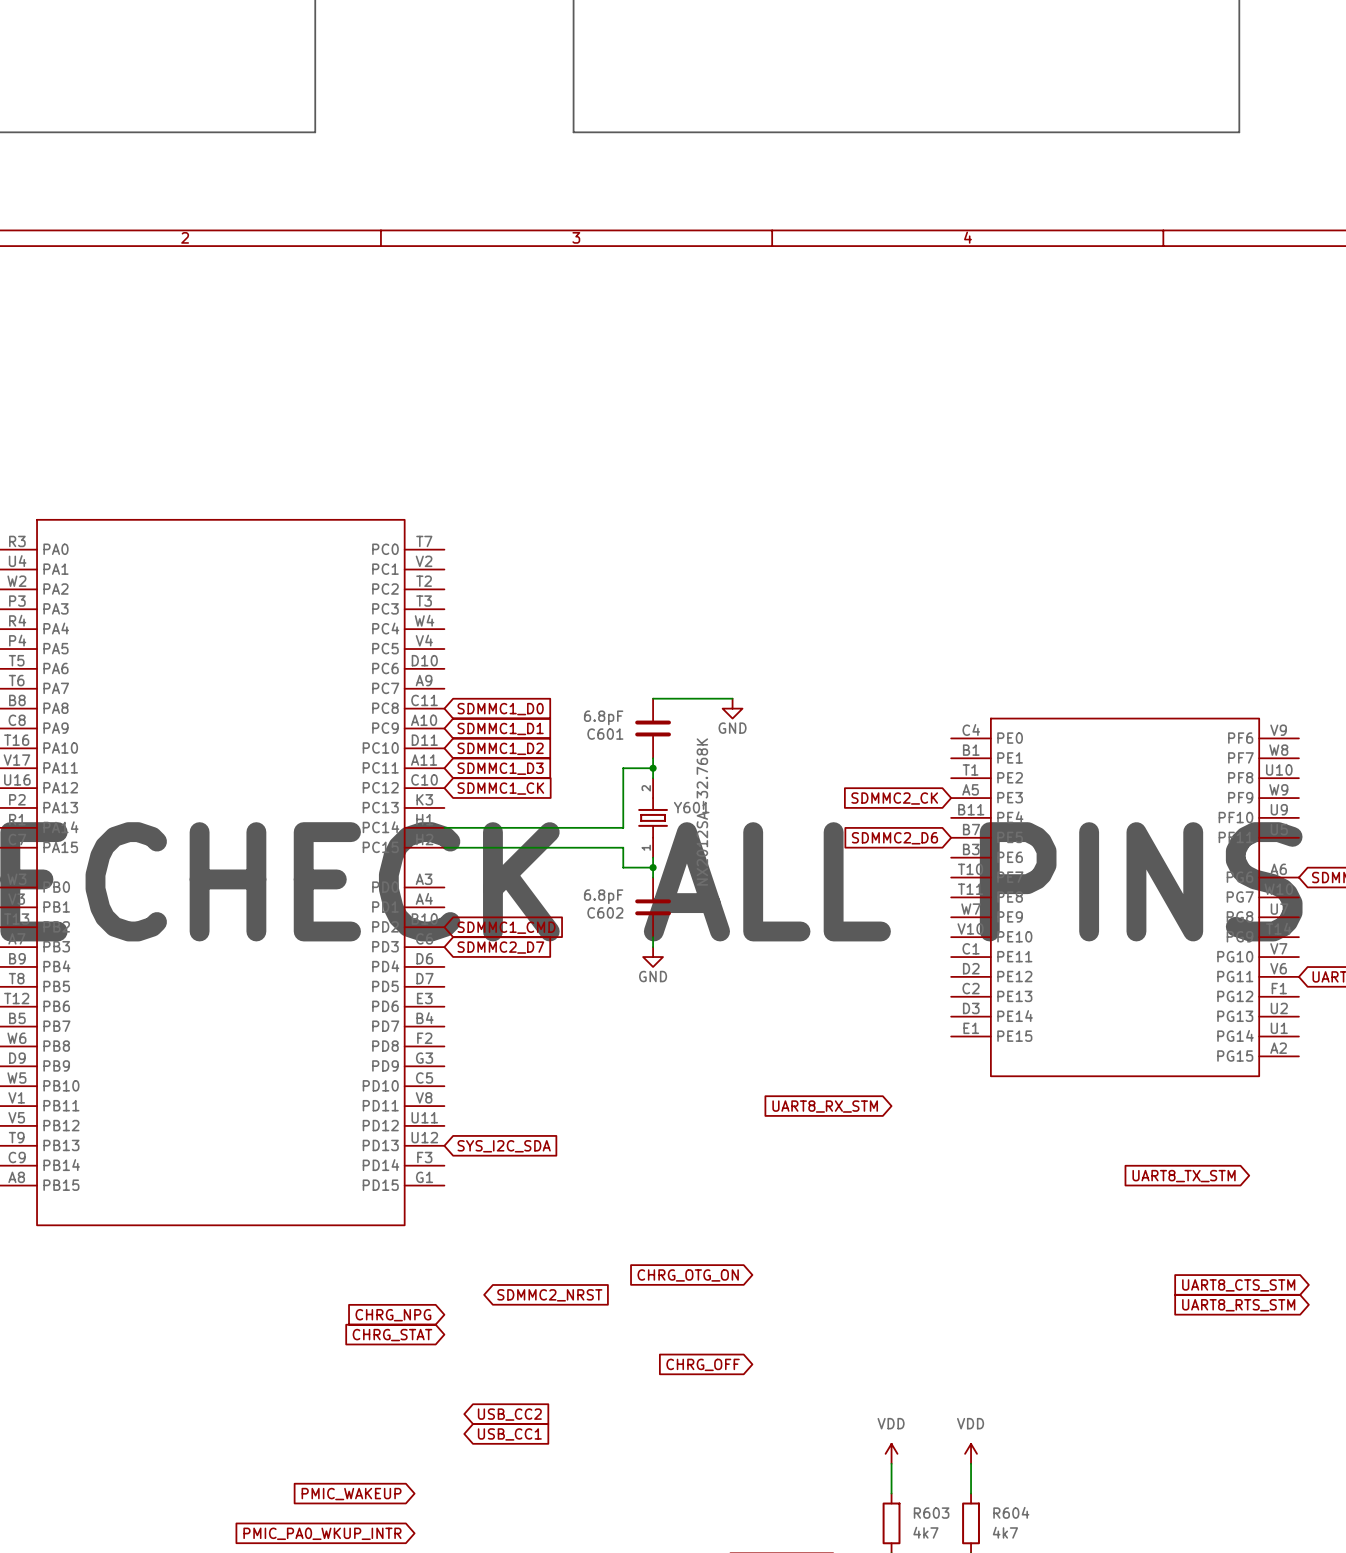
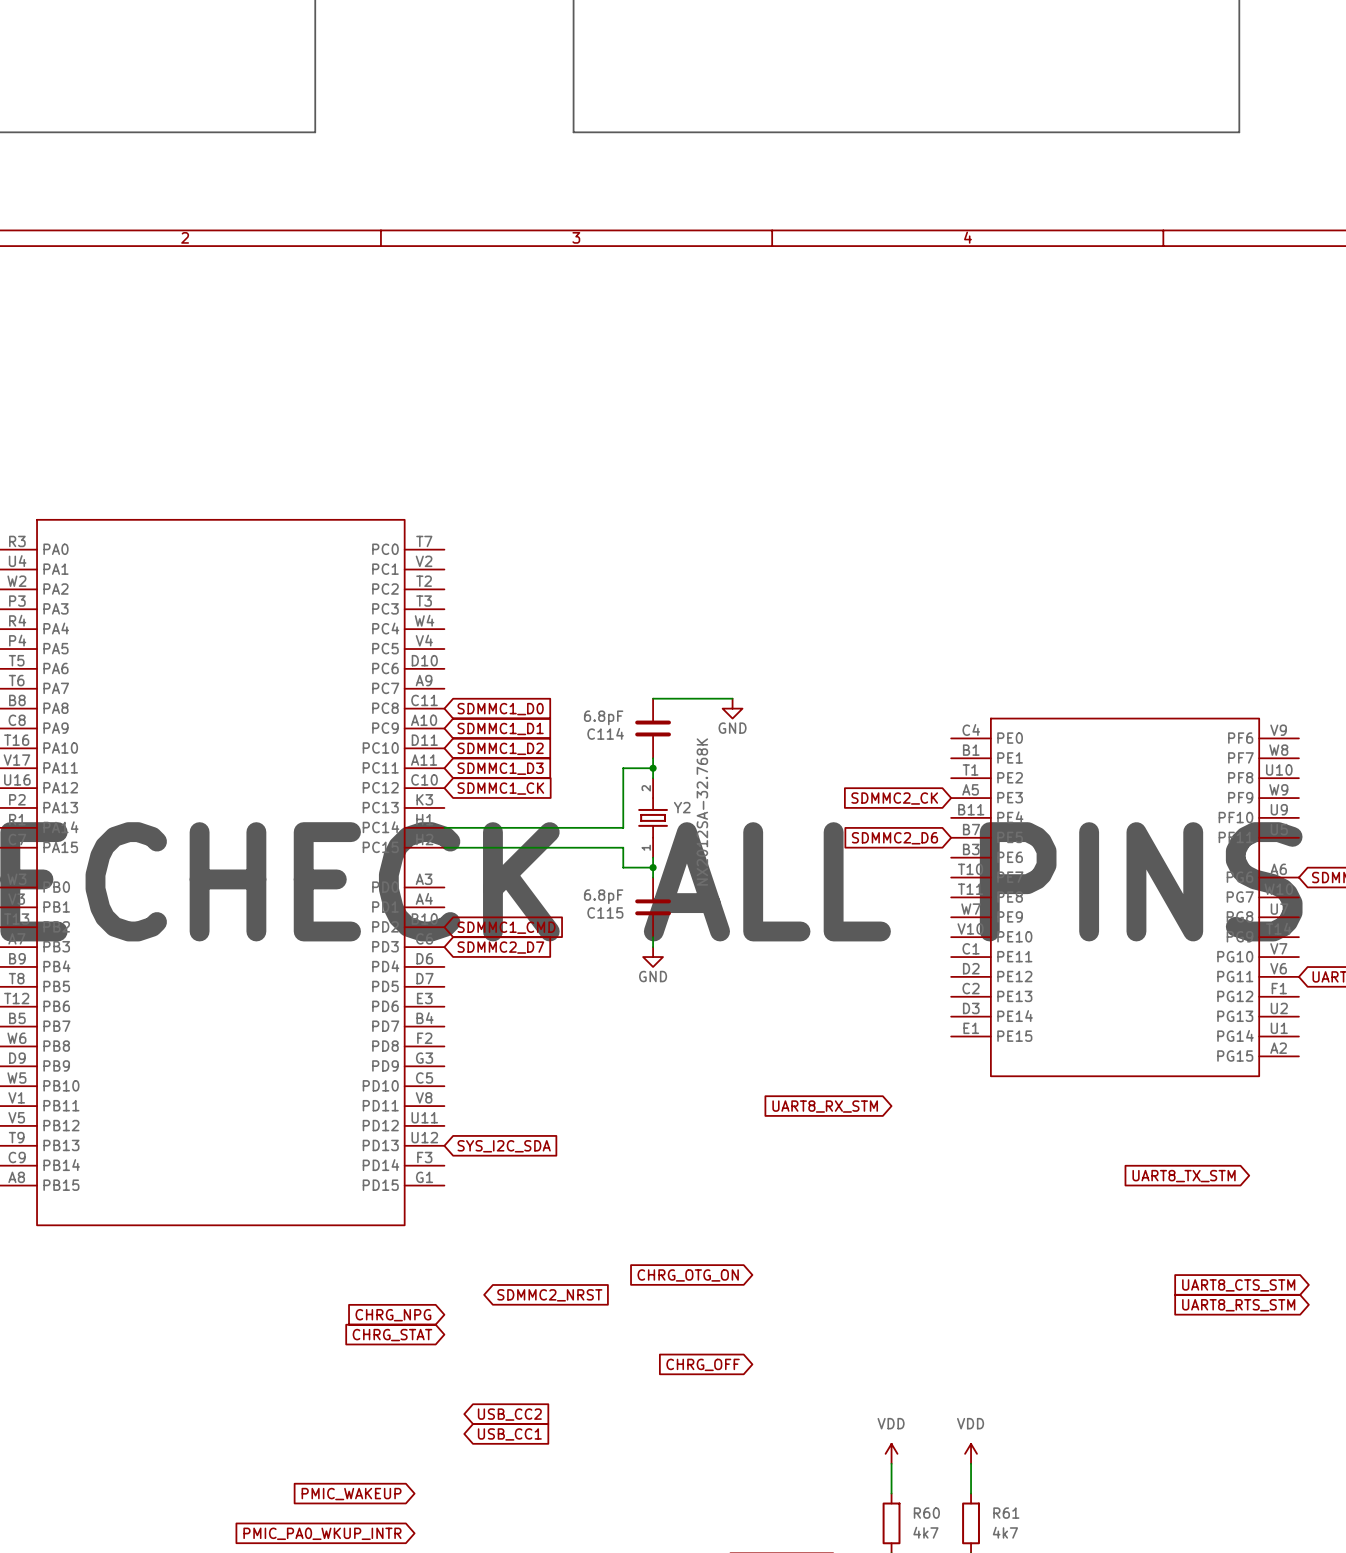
C601 name: C601 (605, 734) -> C114 (605, 733)
Y601 name: Y601 (691, 807) -> Y2 (682, 807)
C602 name: C602 (605, 912) -> C115 (605, 912)
R604 name: R604 (1011, 1512) -> R61 (1006, 1513)
R603 name: R603 (931, 1513) -> R60 (926, 1513)

